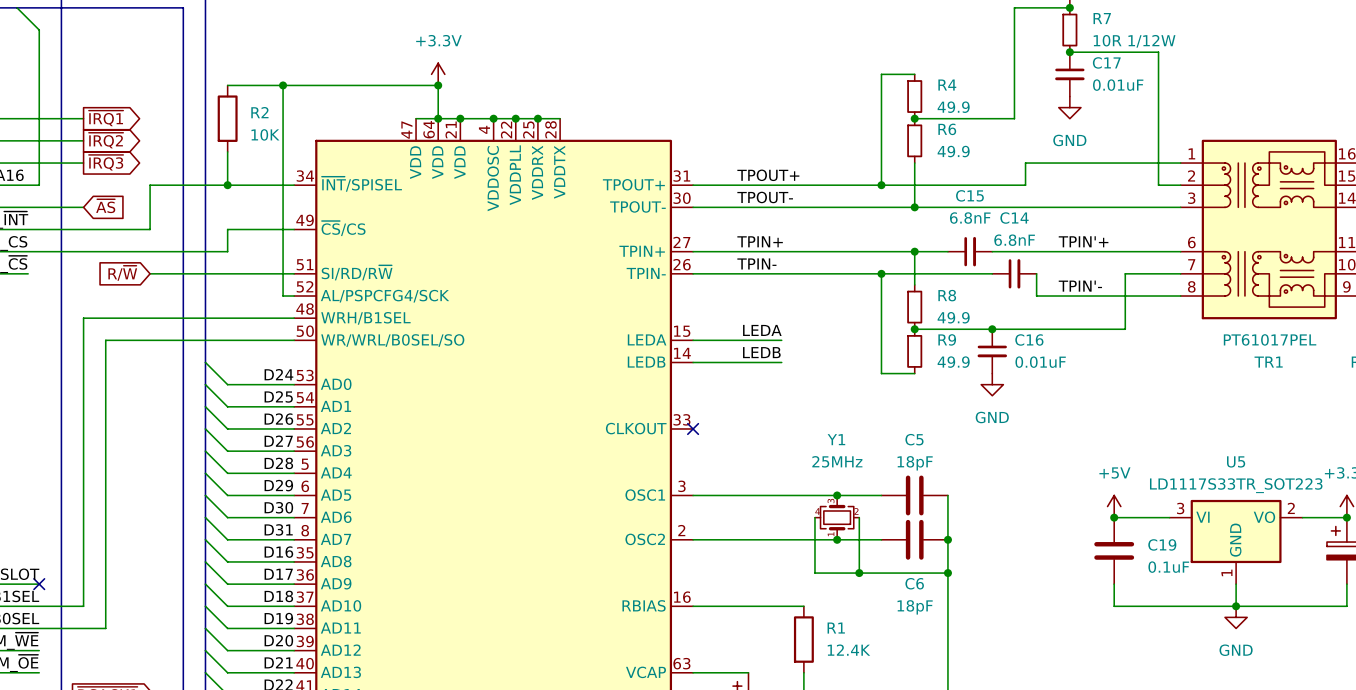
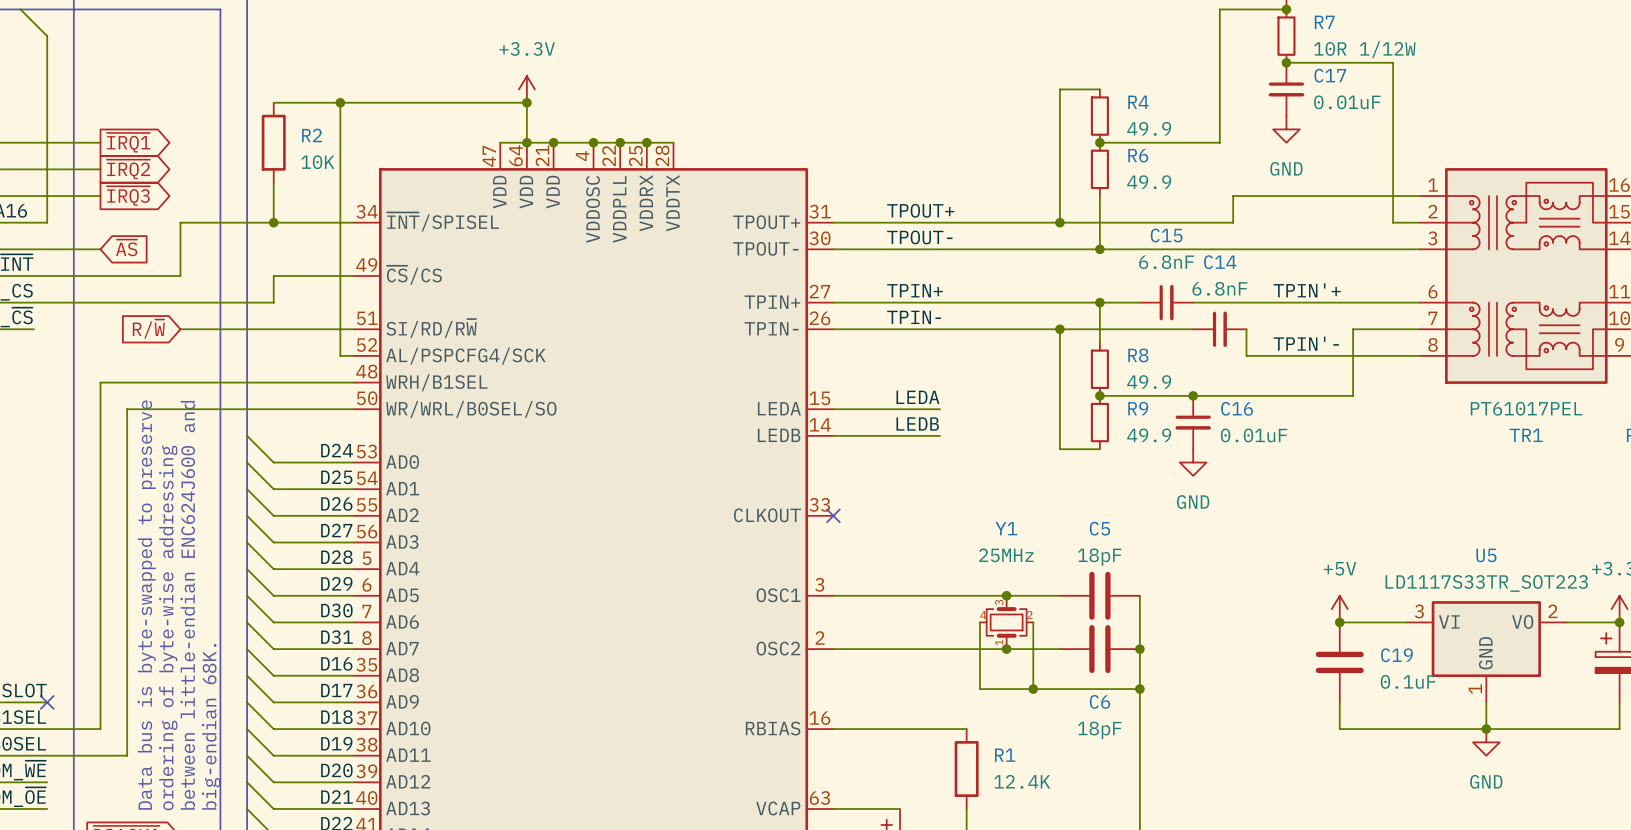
text: none -> between little-endian ENC624J600 and (187, 605)
text: none -> Data bus is byte-swapped to preserve (146, 605)
text: none -> ordering of byte-wise addressing (168, 627)
text: none -> big-endian 68K. (211, 726)

